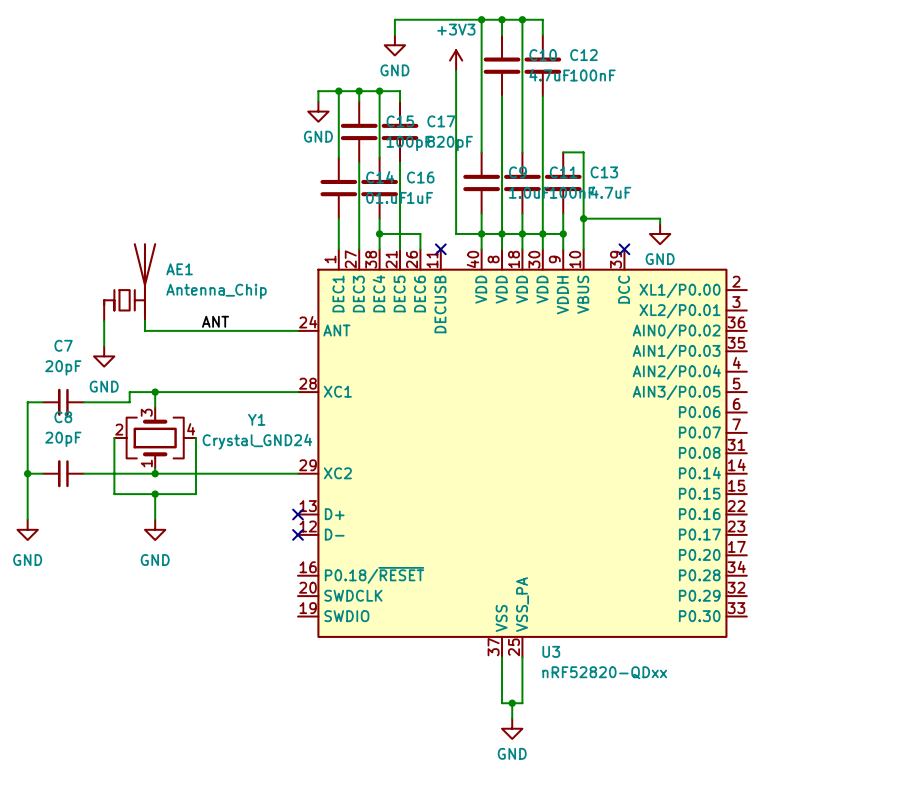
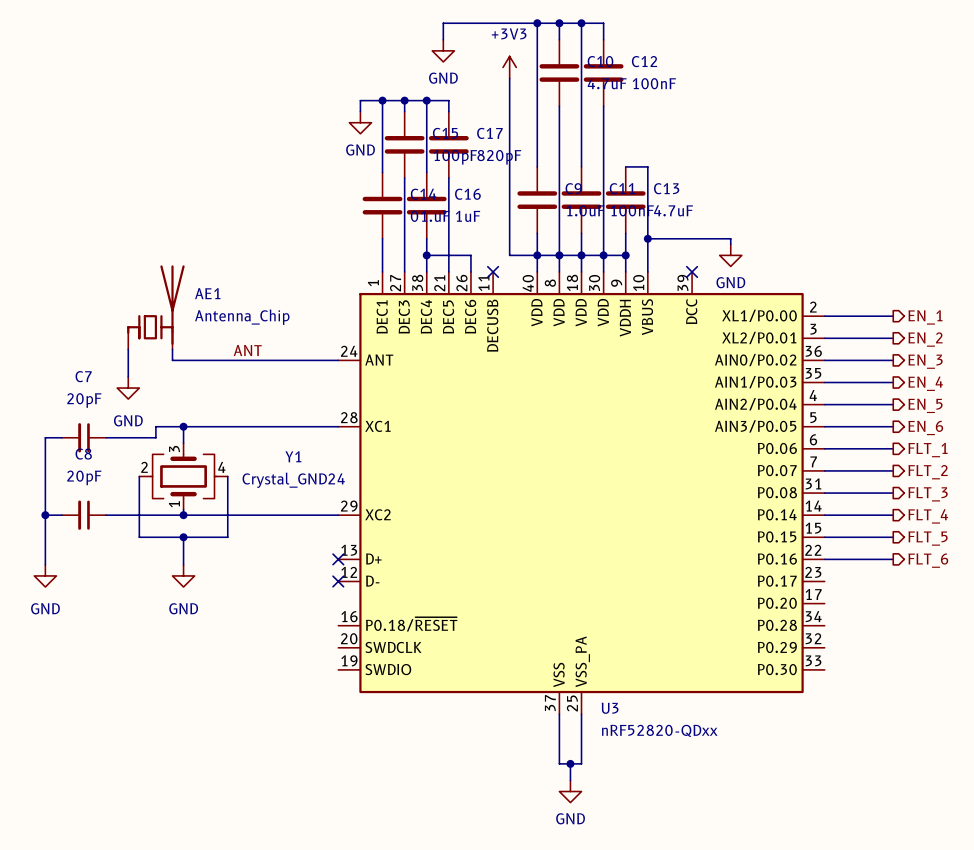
wire: none -> (824, 316) (893, 316)
hierarchical label: none -> EN_1 (925, 317)
wire: none -> (824, 338) (893, 338)
hierarchical label: none -> EN_2 (925, 339)
wire: none -> (824, 360) (893, 360)
hierarchical label: none -> EN_3 (925, 361)
wire: none -> (824, 382) (893, 382)
hierarchical label: none -> EN_4 (925, 383)
wire: none -> (824, 404) (893, 404)
hierarchical label: none -> EN_5 (925, 405)
wire: none -> (824, 426) (893, 426)
hierarchical label: none -> EN_6 (925, 427)
wire: none -> (824, 448) (893, 448)
hierarchical label: none -> FLT_1 (928, 450)
wire: none -> (824, 470) (893, 470)
hierarchical label: none -> FLT_2 (928, 472)
wire: none -> (824, 493) (893, 493)
hierarchical label: none -> FLT_3 (928, 494)
wire: none -> (824, 515) (893, 515)
hierarchical label: none -> FLT_4 (928, 516)
wire: none -> (824, 537) (893, 537)
hierarchical label: none -> FLT_5 (928, 538)
wire: none -> (824, 559) (893, 559)
hierarchical label: none -> FLT_6 (928, 560)

